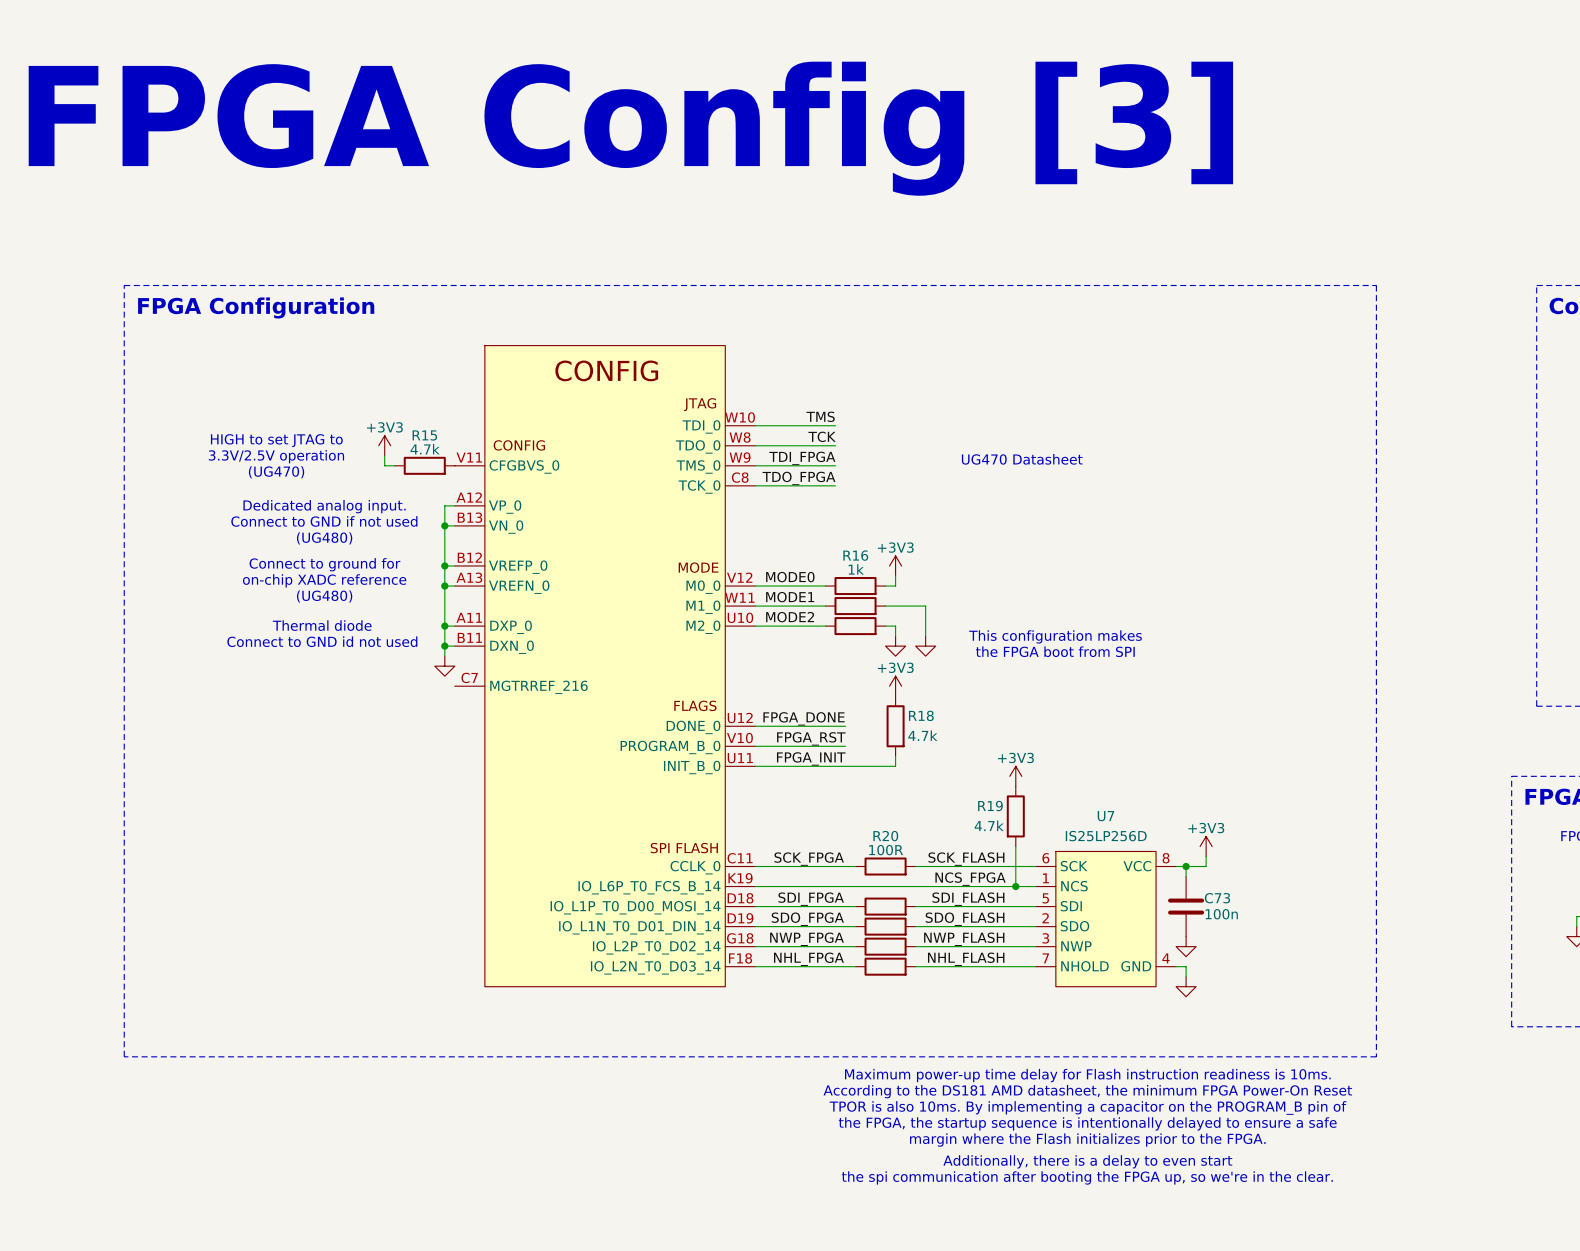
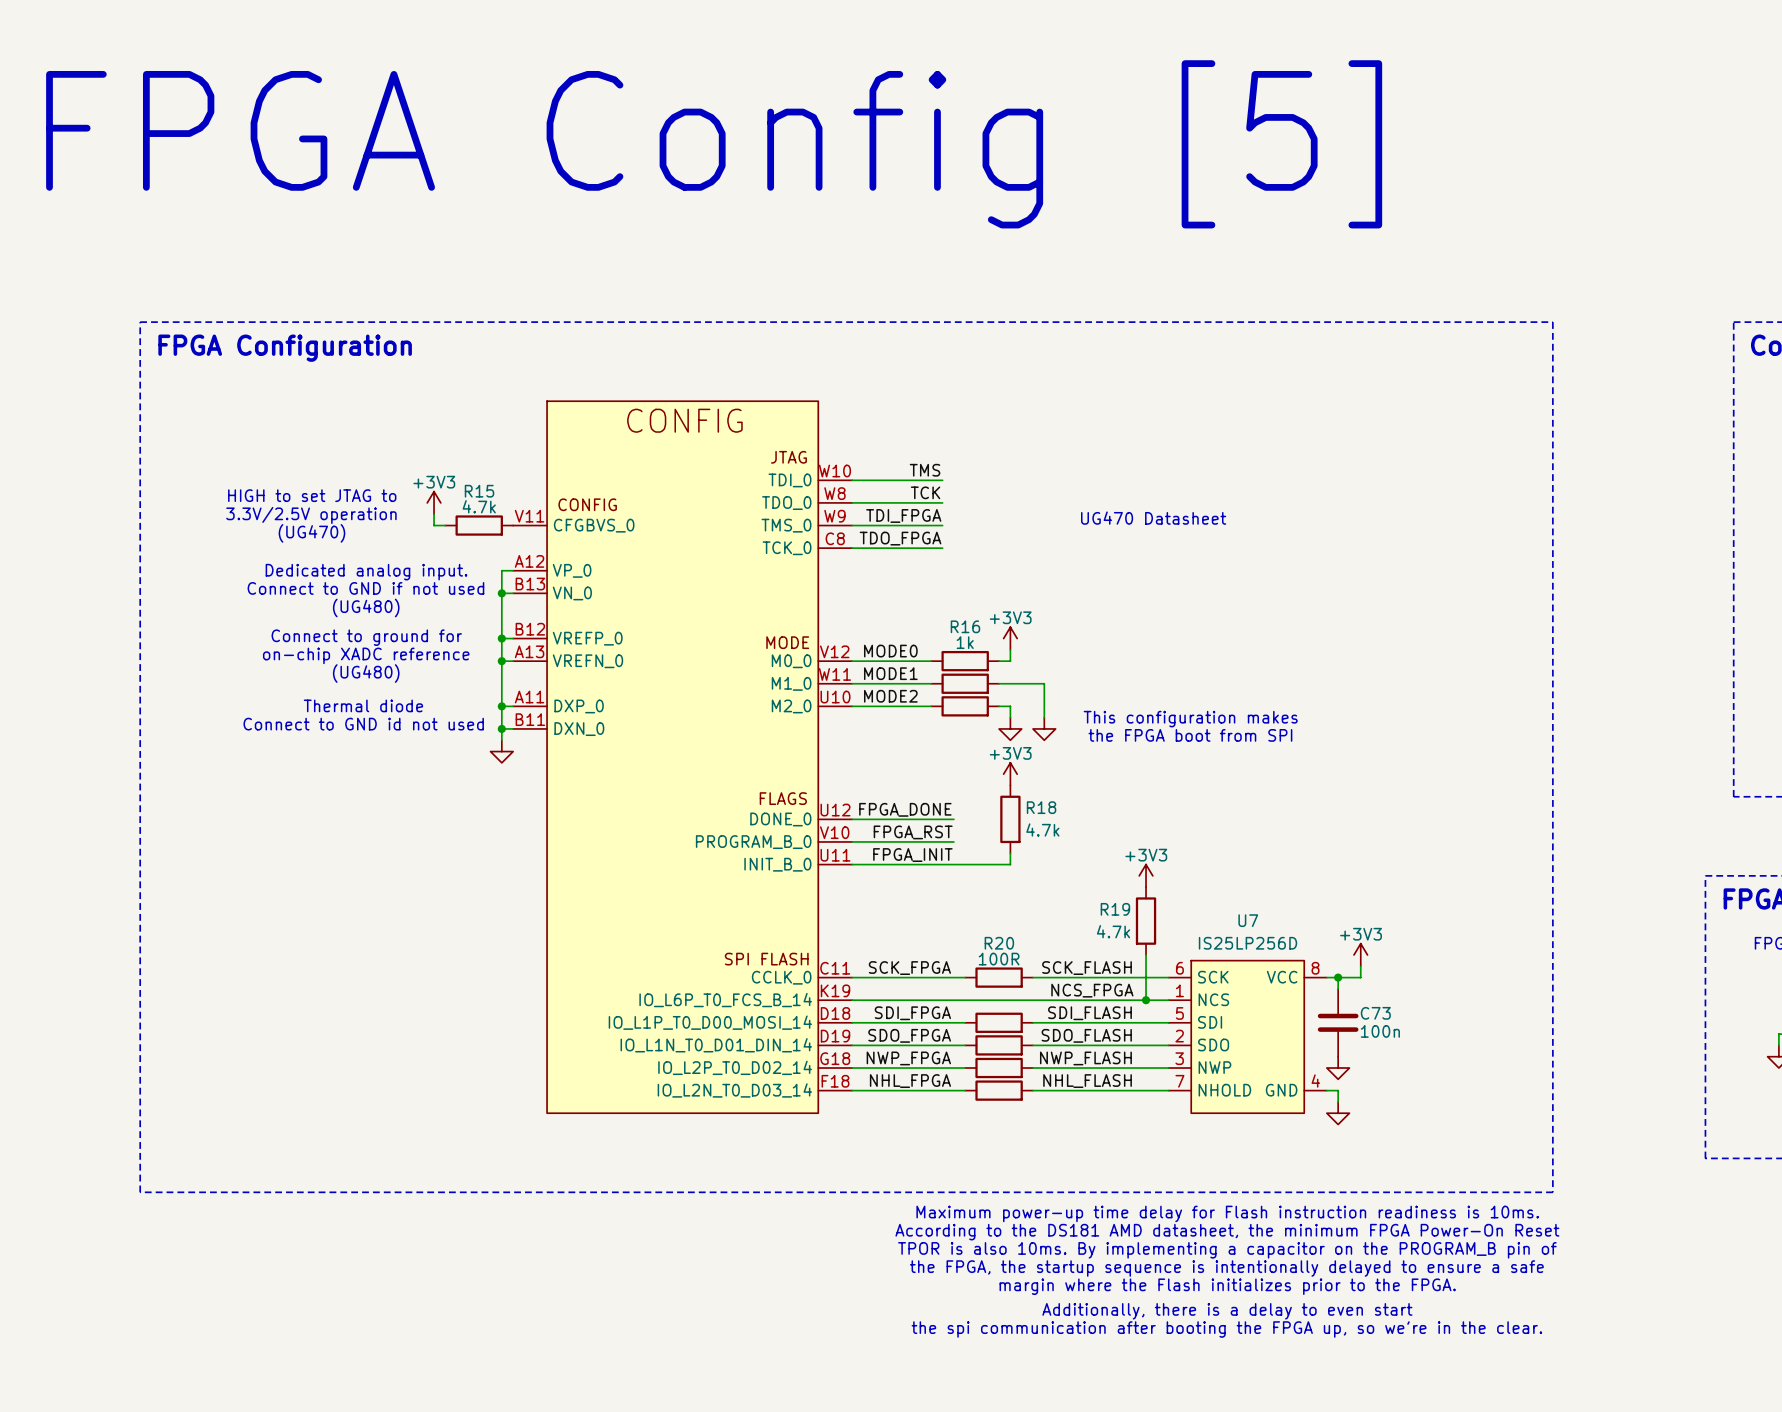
text: FPGA Config [3] (630, 128) -> FPGA Config [5] (714, 144)
part symbol: [454, 345, 756, 987] -> [513, 401, 853, 1114]

